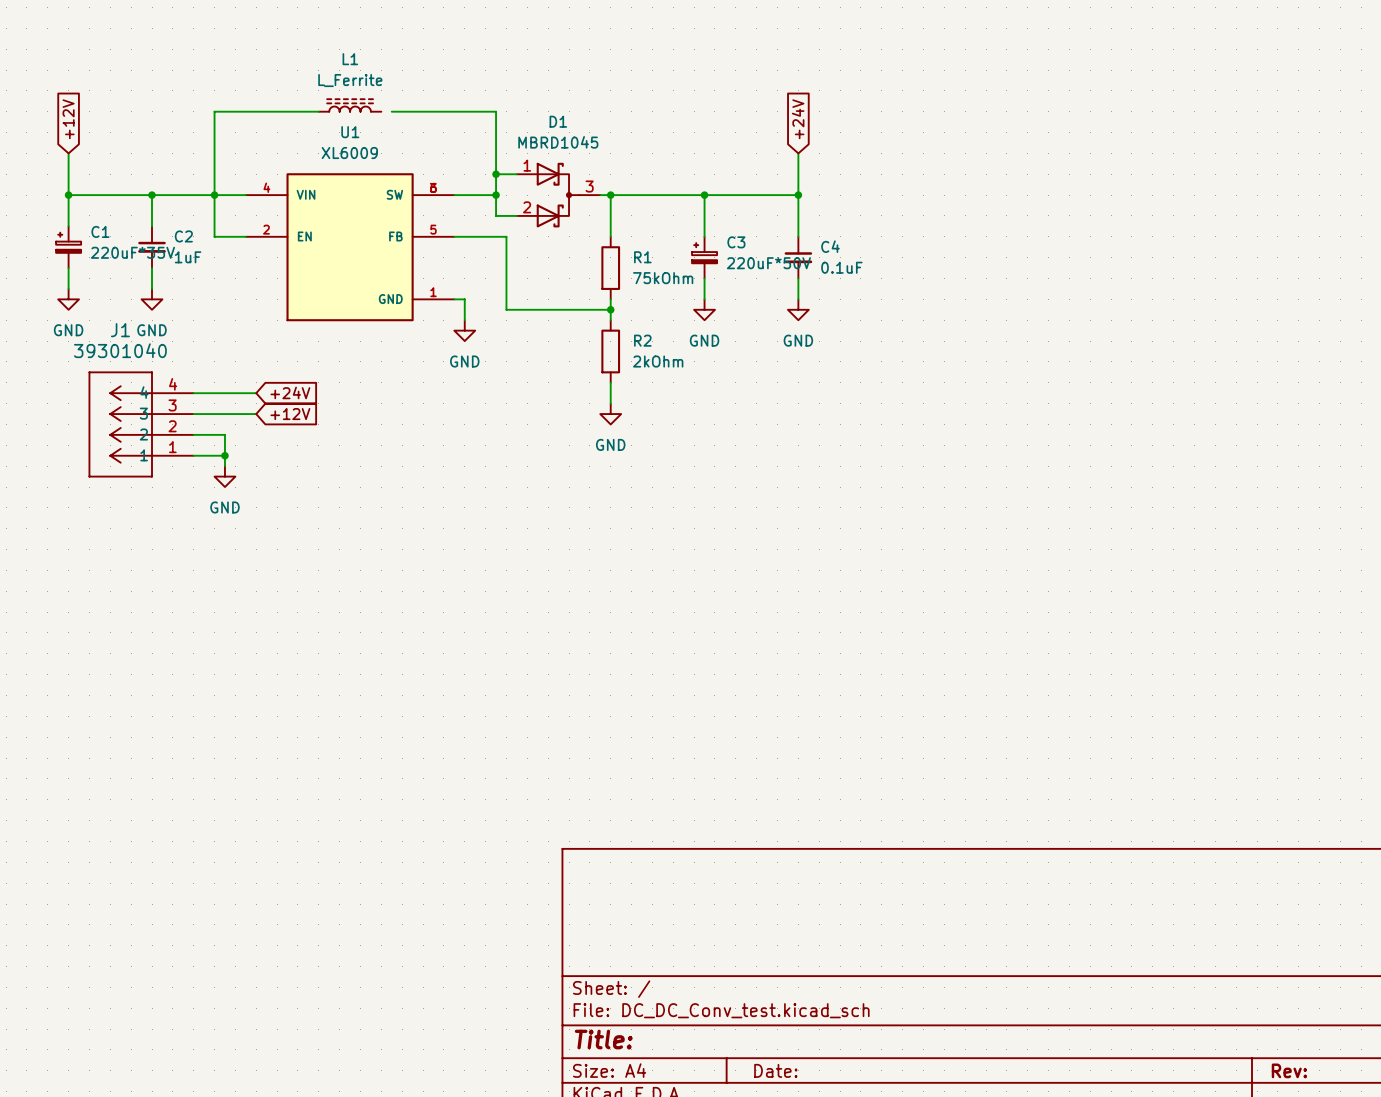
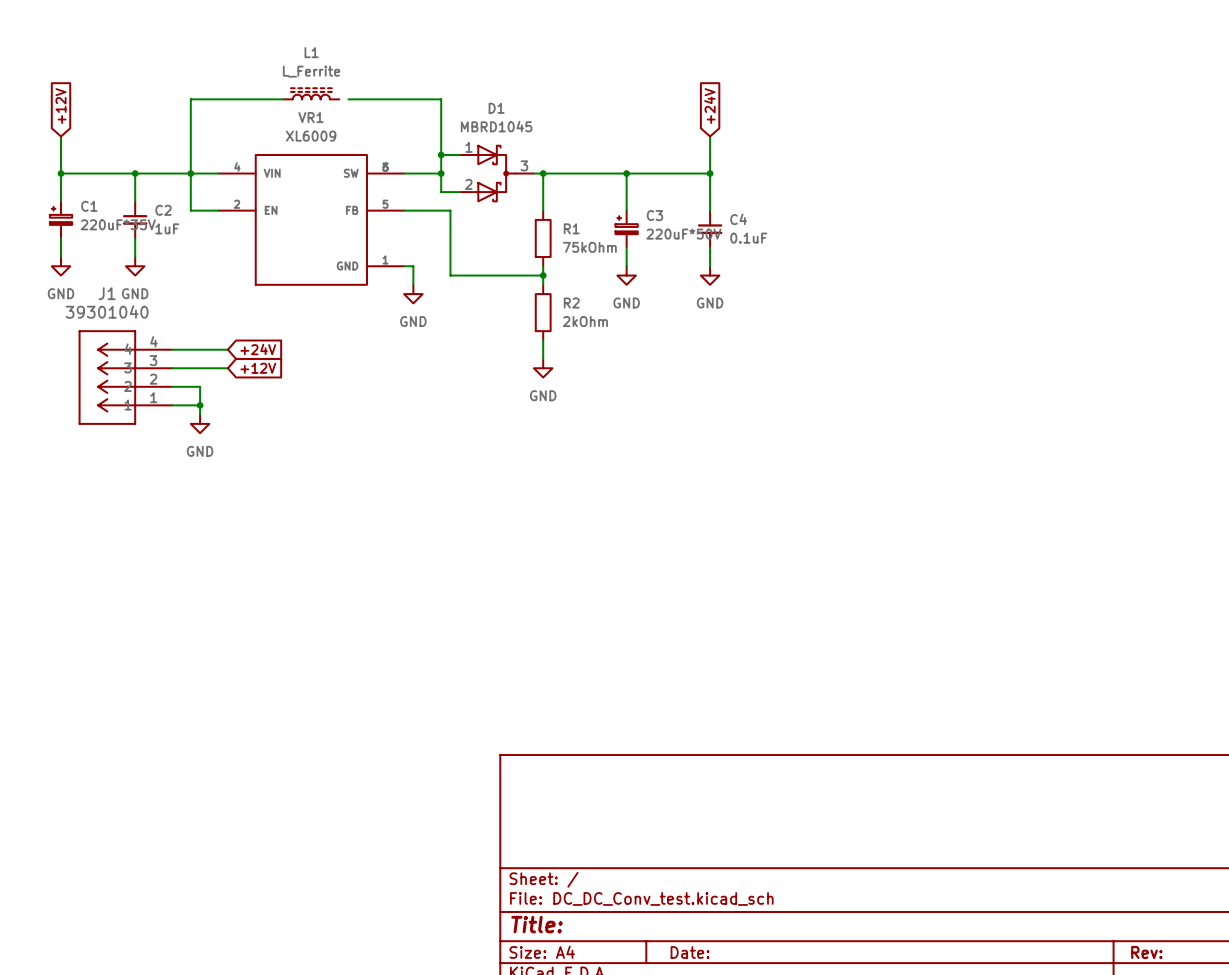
U1 name: U1 (350, 132) -> VR1 (310, 117)

